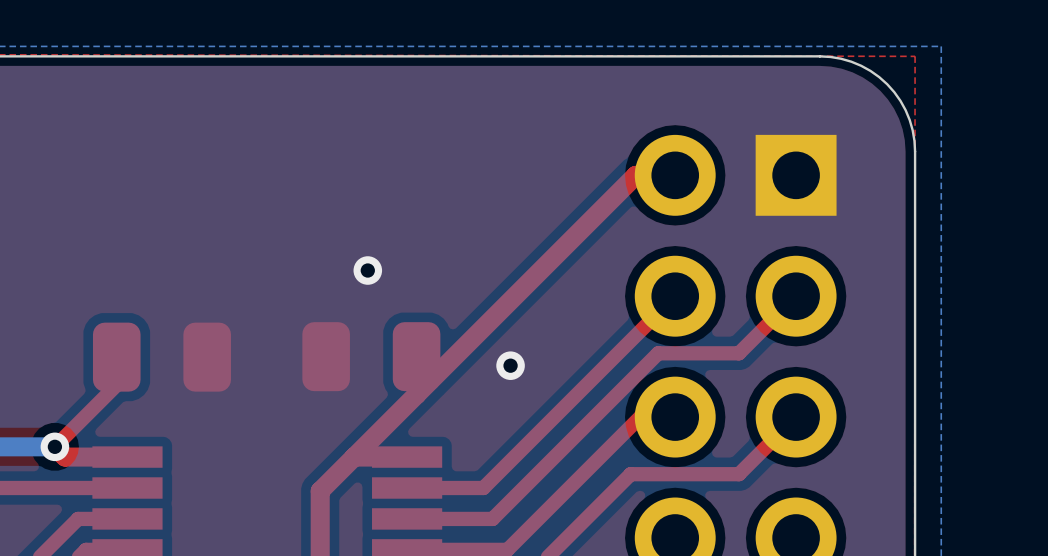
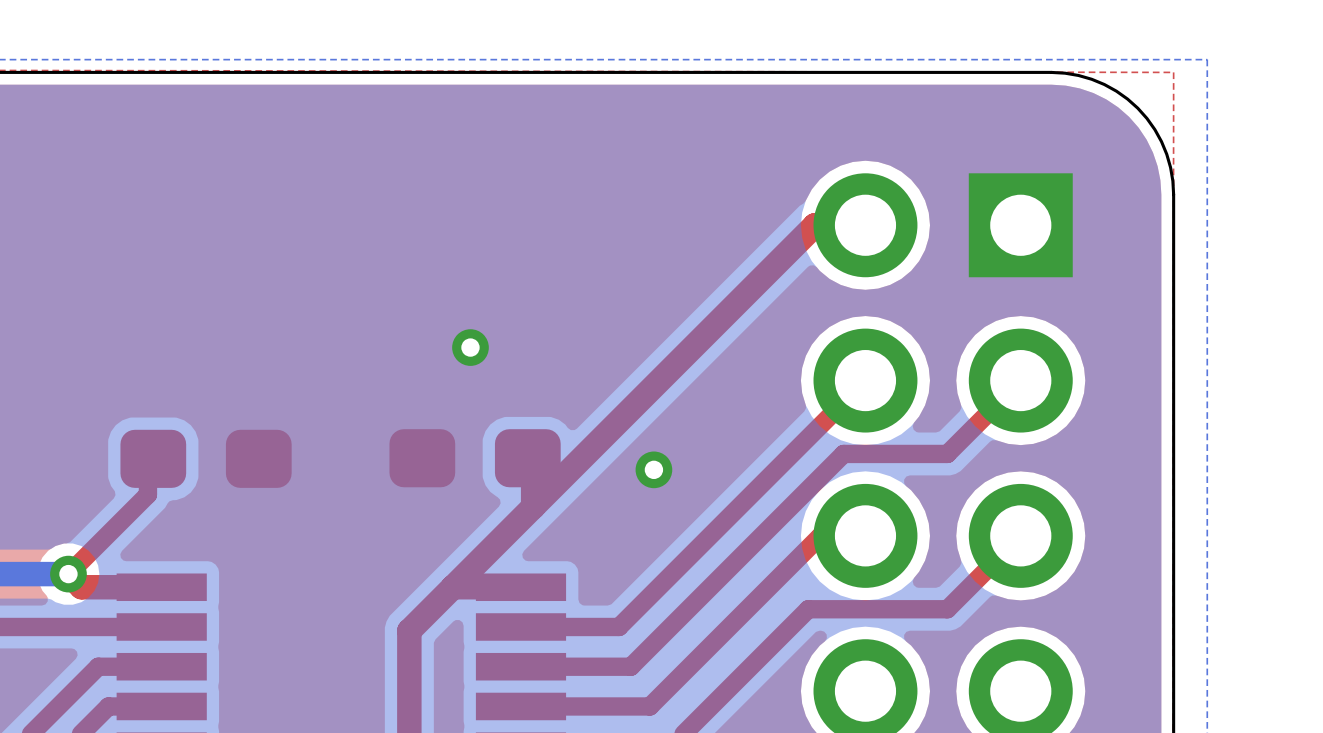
part footprint: [92, 322, 231, 392] -> [120, 429, 292, 488]
part footprint: [302, 322, 441, 392] -> [389, 429, 561, 488]

